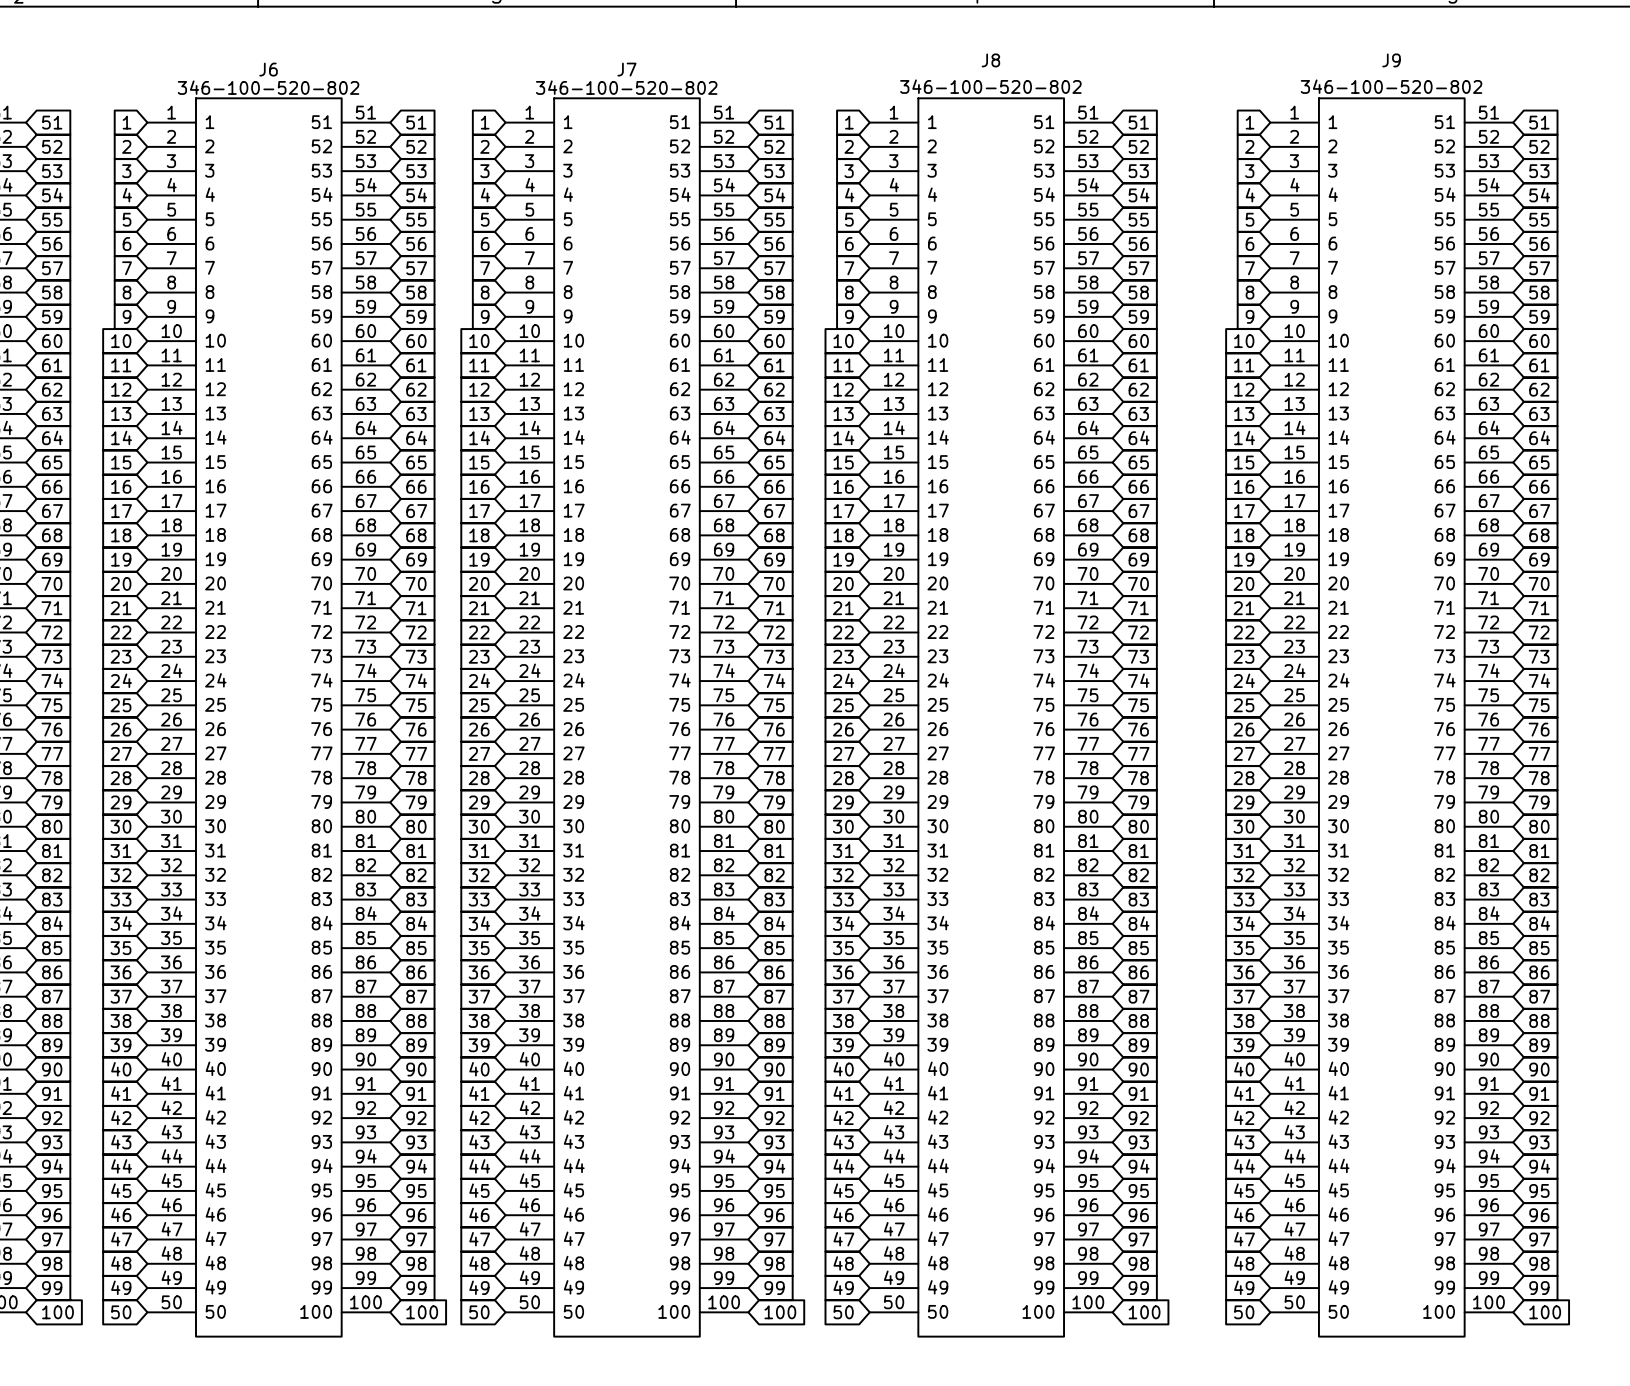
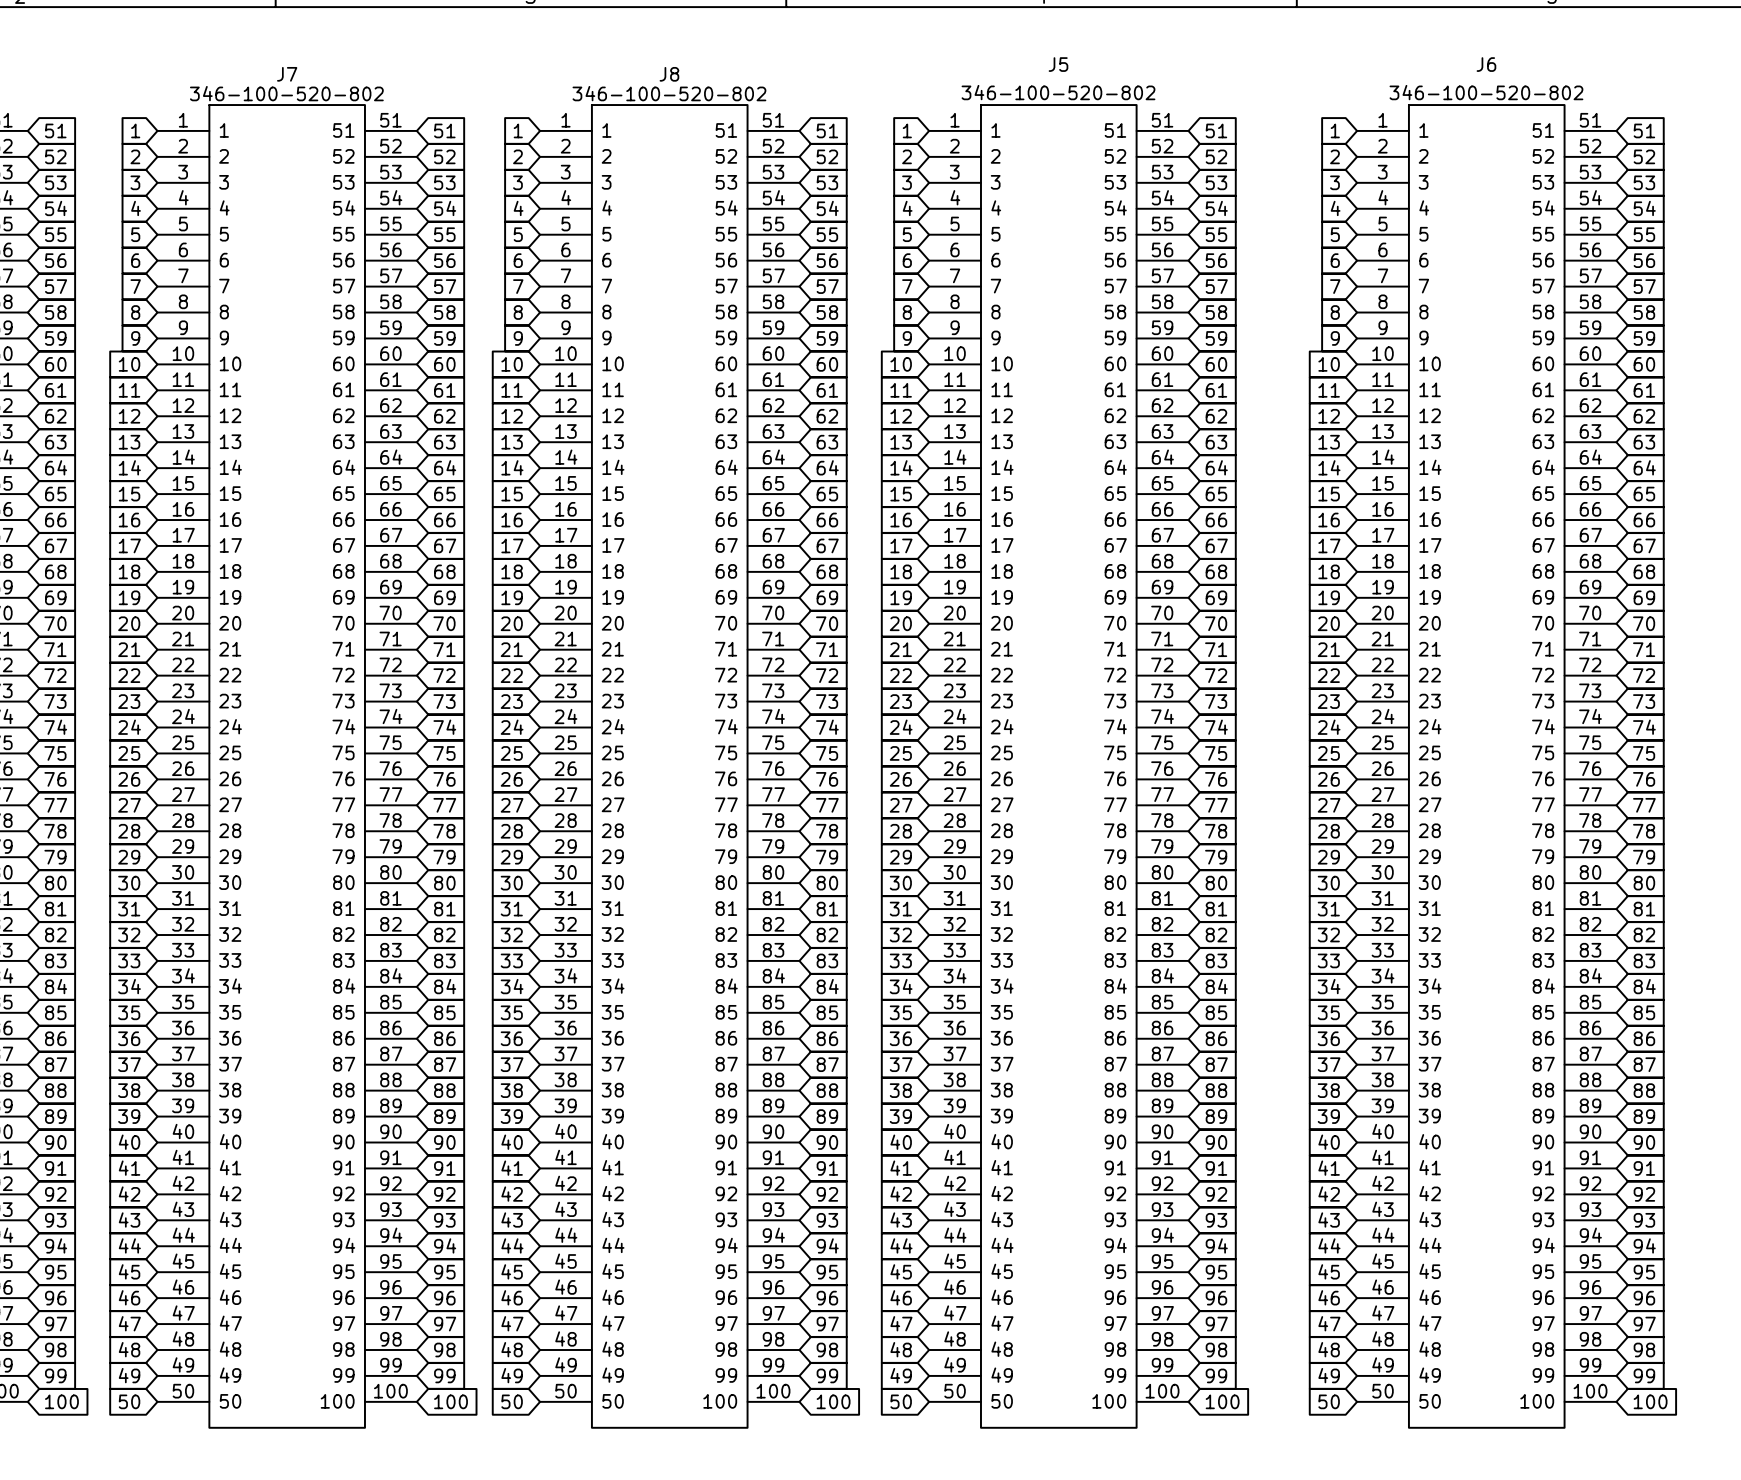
J8 name: J8 (990, 60) -> J5 (1058, 64)
J9 name: J9 (1391, 60) -> J6 (1486, 64)
J6 name: J6 (268, 69) -> J7 (287, 74)
J7 name: J7 (626, 69) -> J8 (669, 74)

